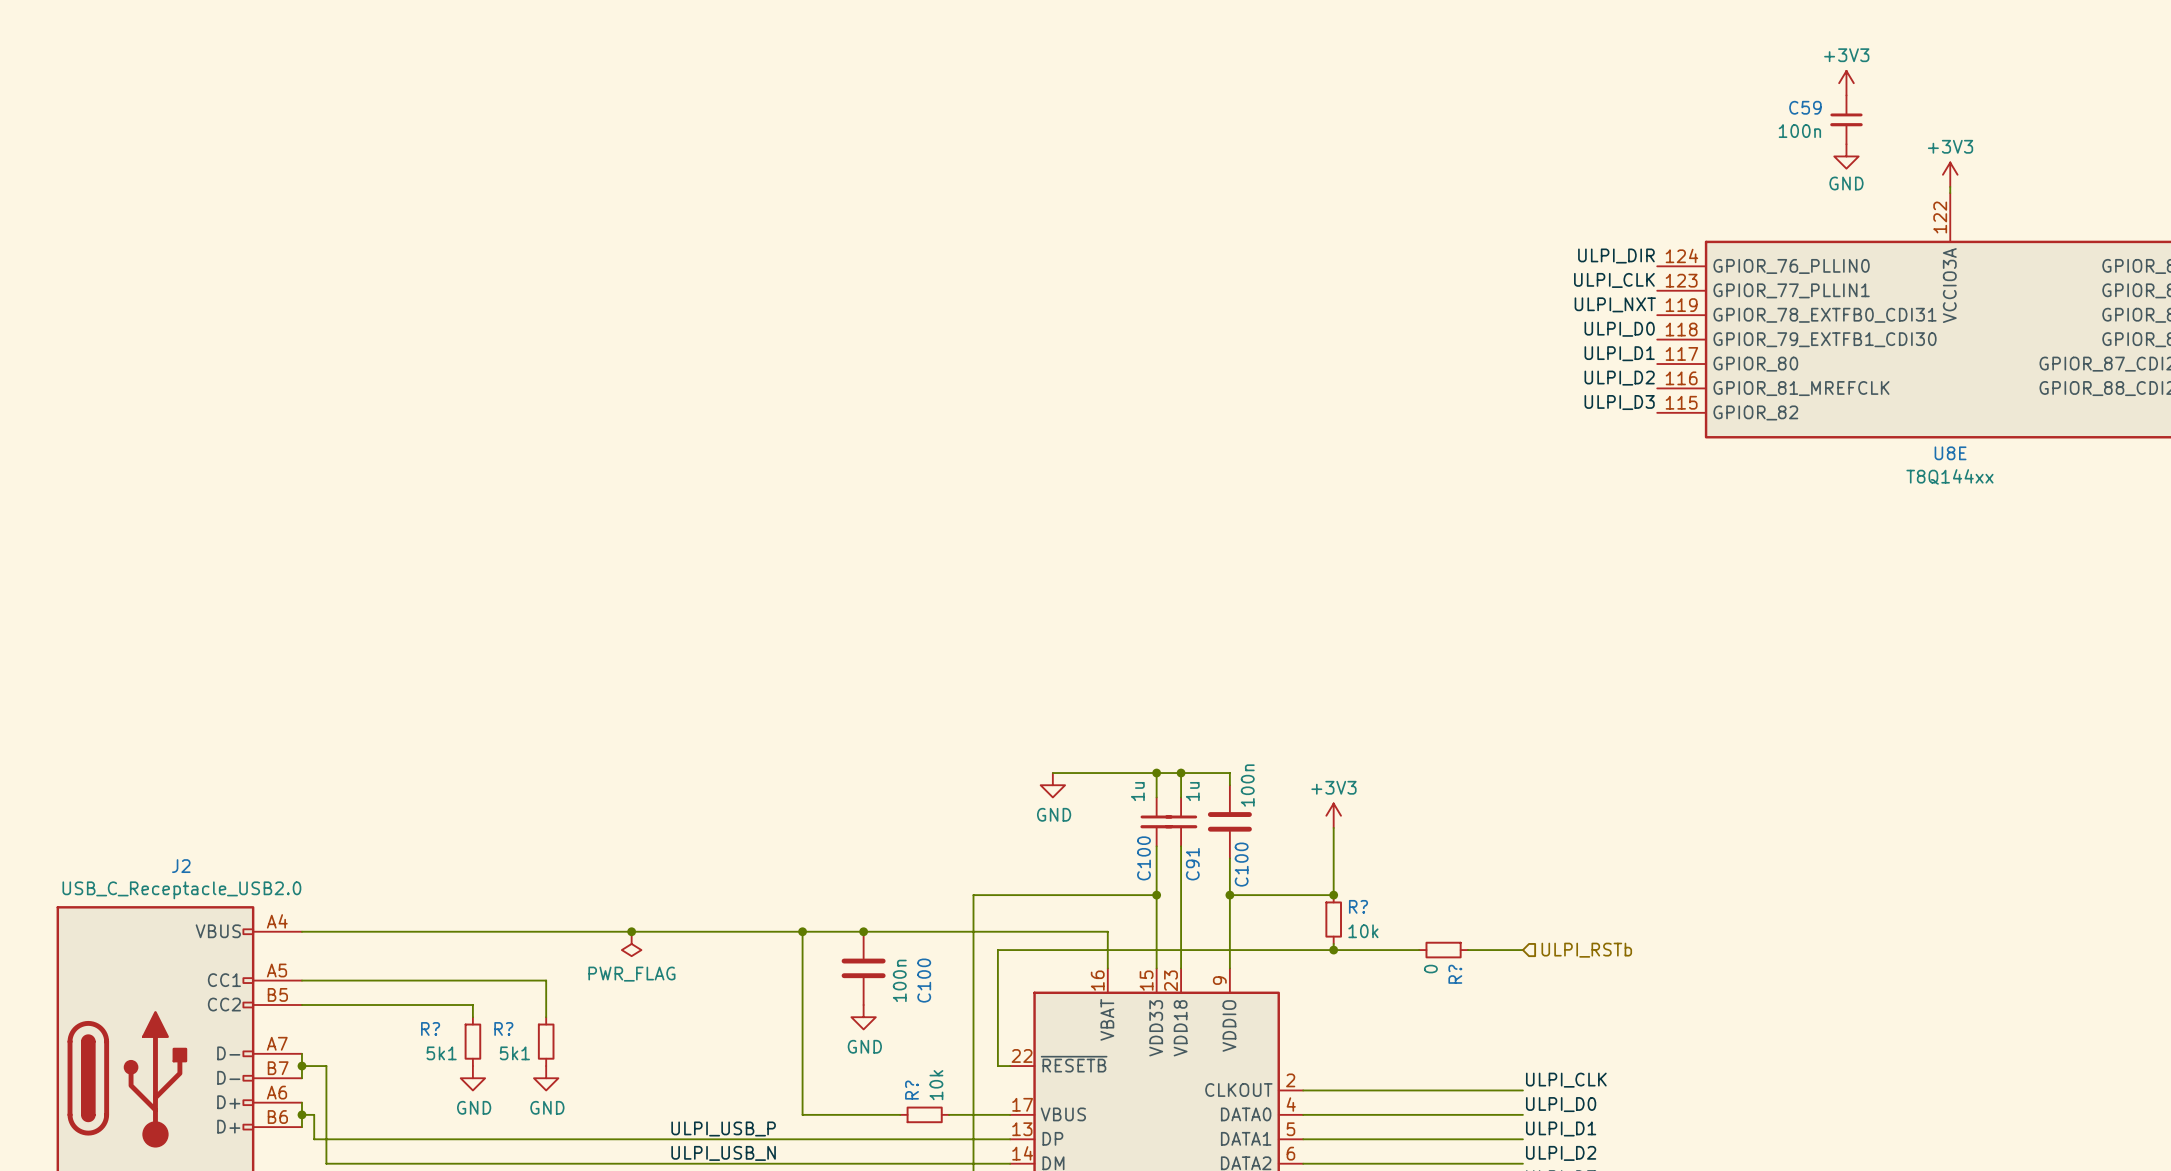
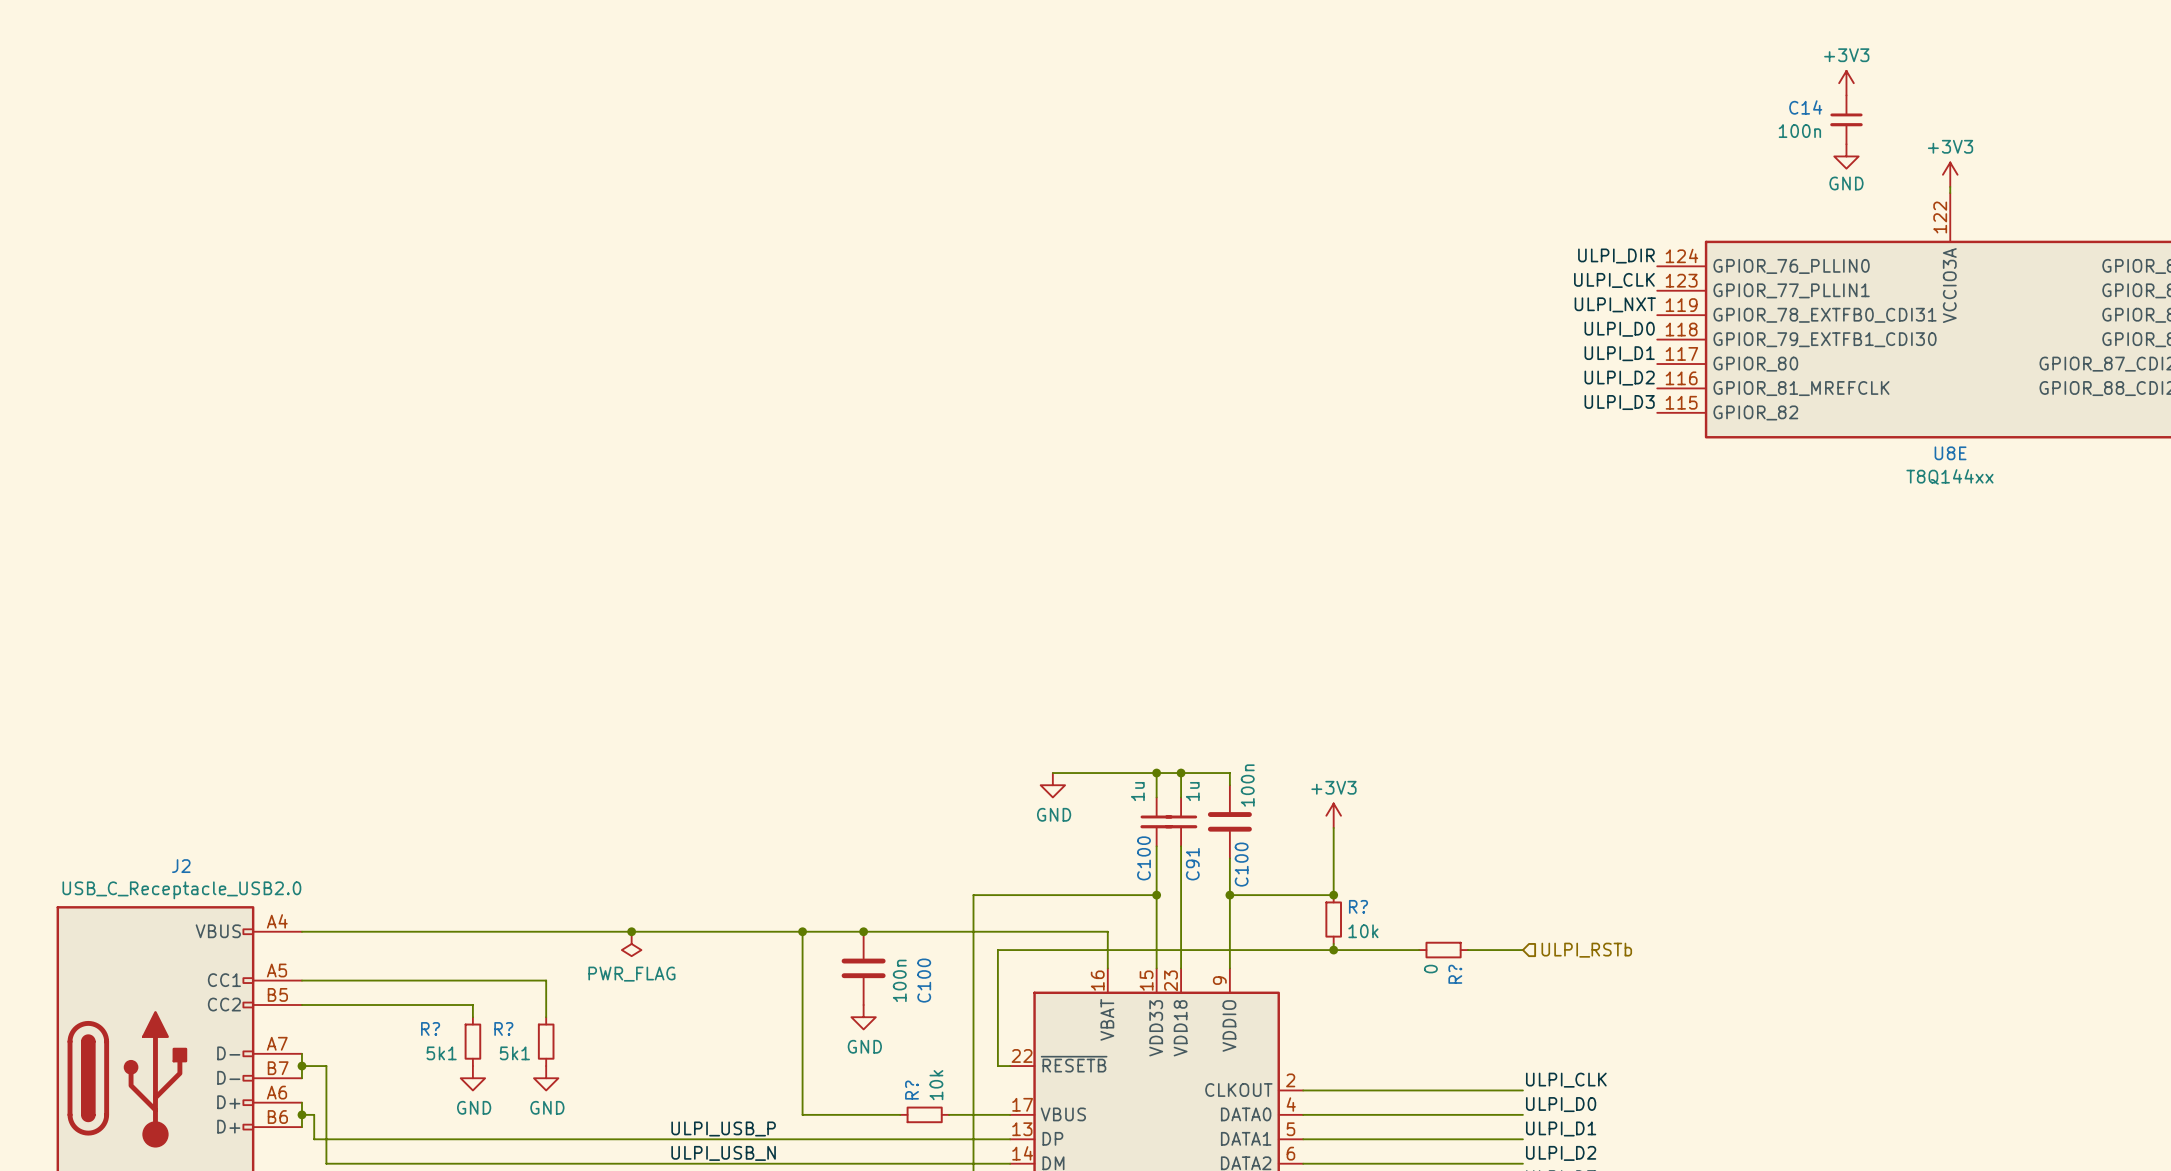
C59 name: C59 (1805, 107) -> C14 (1805, 107)

